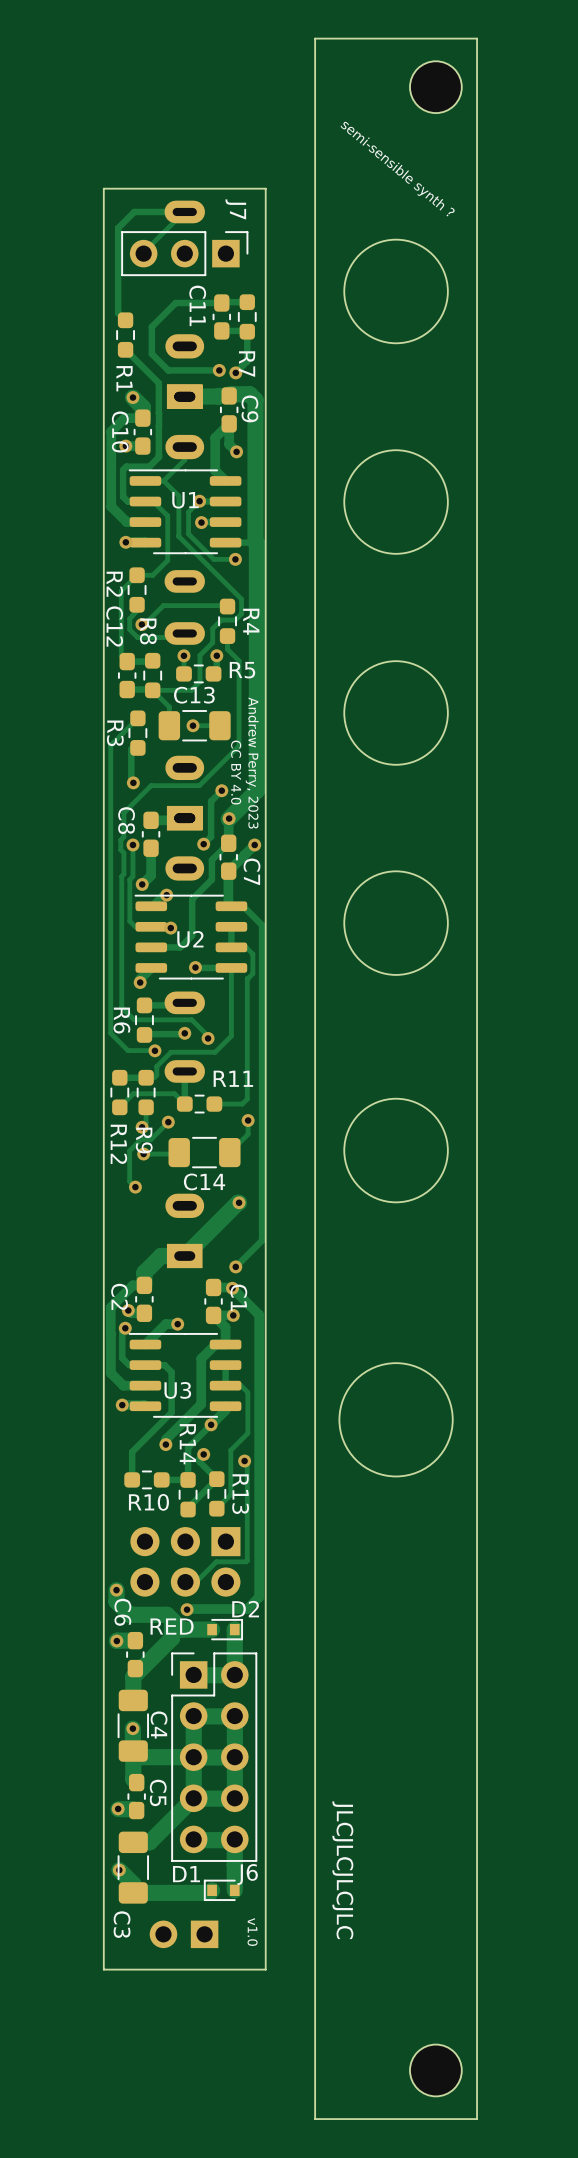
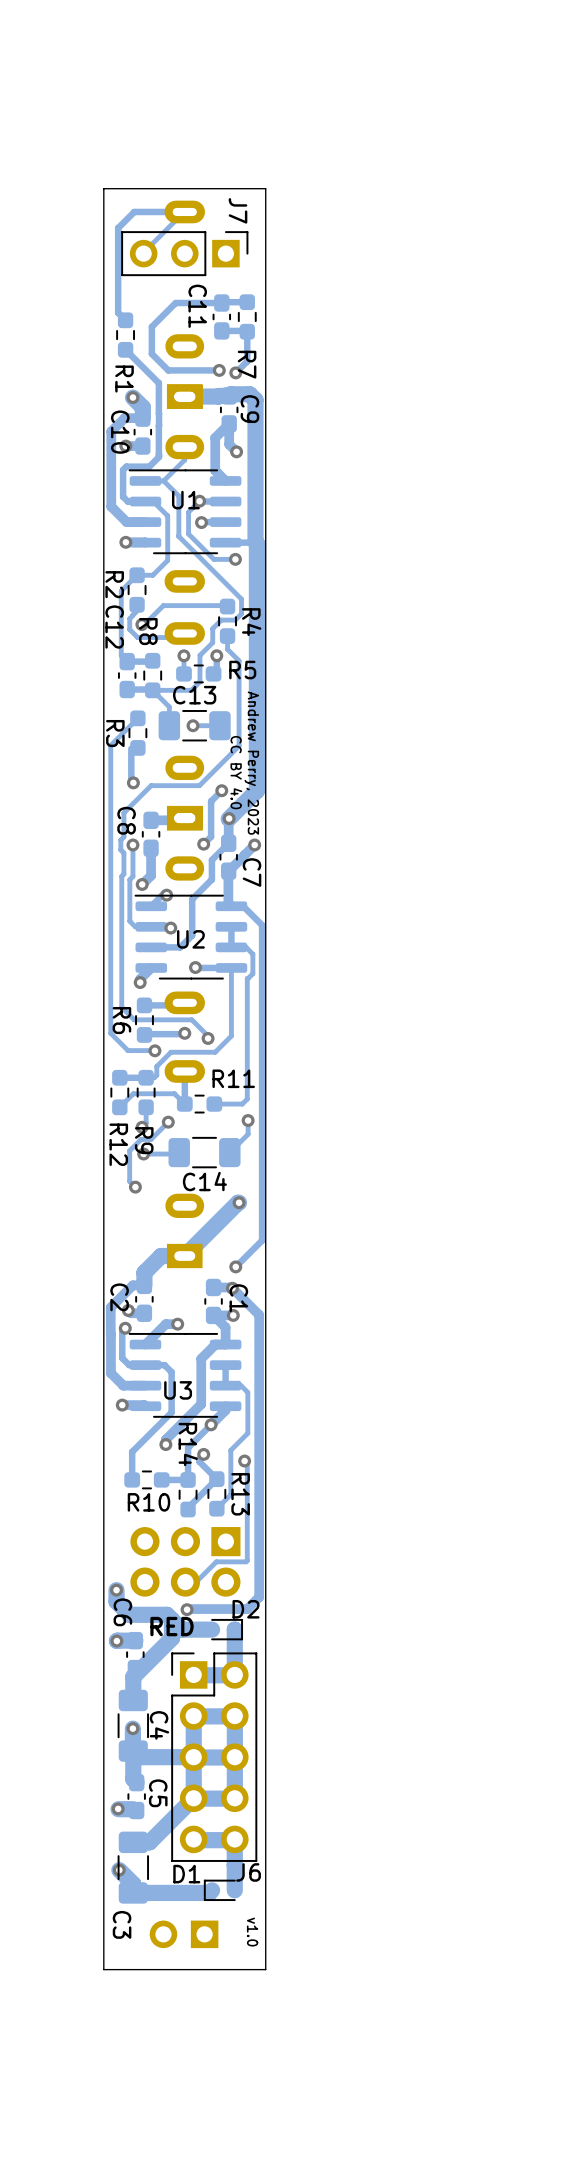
board edge: (477, 38) (315, 38) (315, 2119) (477, 2119) (477, 38) -> none
part: (435, 87) -> none
text: semi-sensible synth ? (397, 169) -> none
round board edge: [343, 239, 449, 344] -> none
round board edge: [343, 449, 449, 555] -> none
round board edge: [343, 660, 449, 766] -> none
round board edge: [343, 870, 449, 976] -> none
round board edge: [343, 1098, 449, 1203] -> none
round board edge: [339, 1362, 454, 1477] -> none
text: JLCJLCJLCJLC (342, 1870) -> none
part: (435, 2070) -> none

